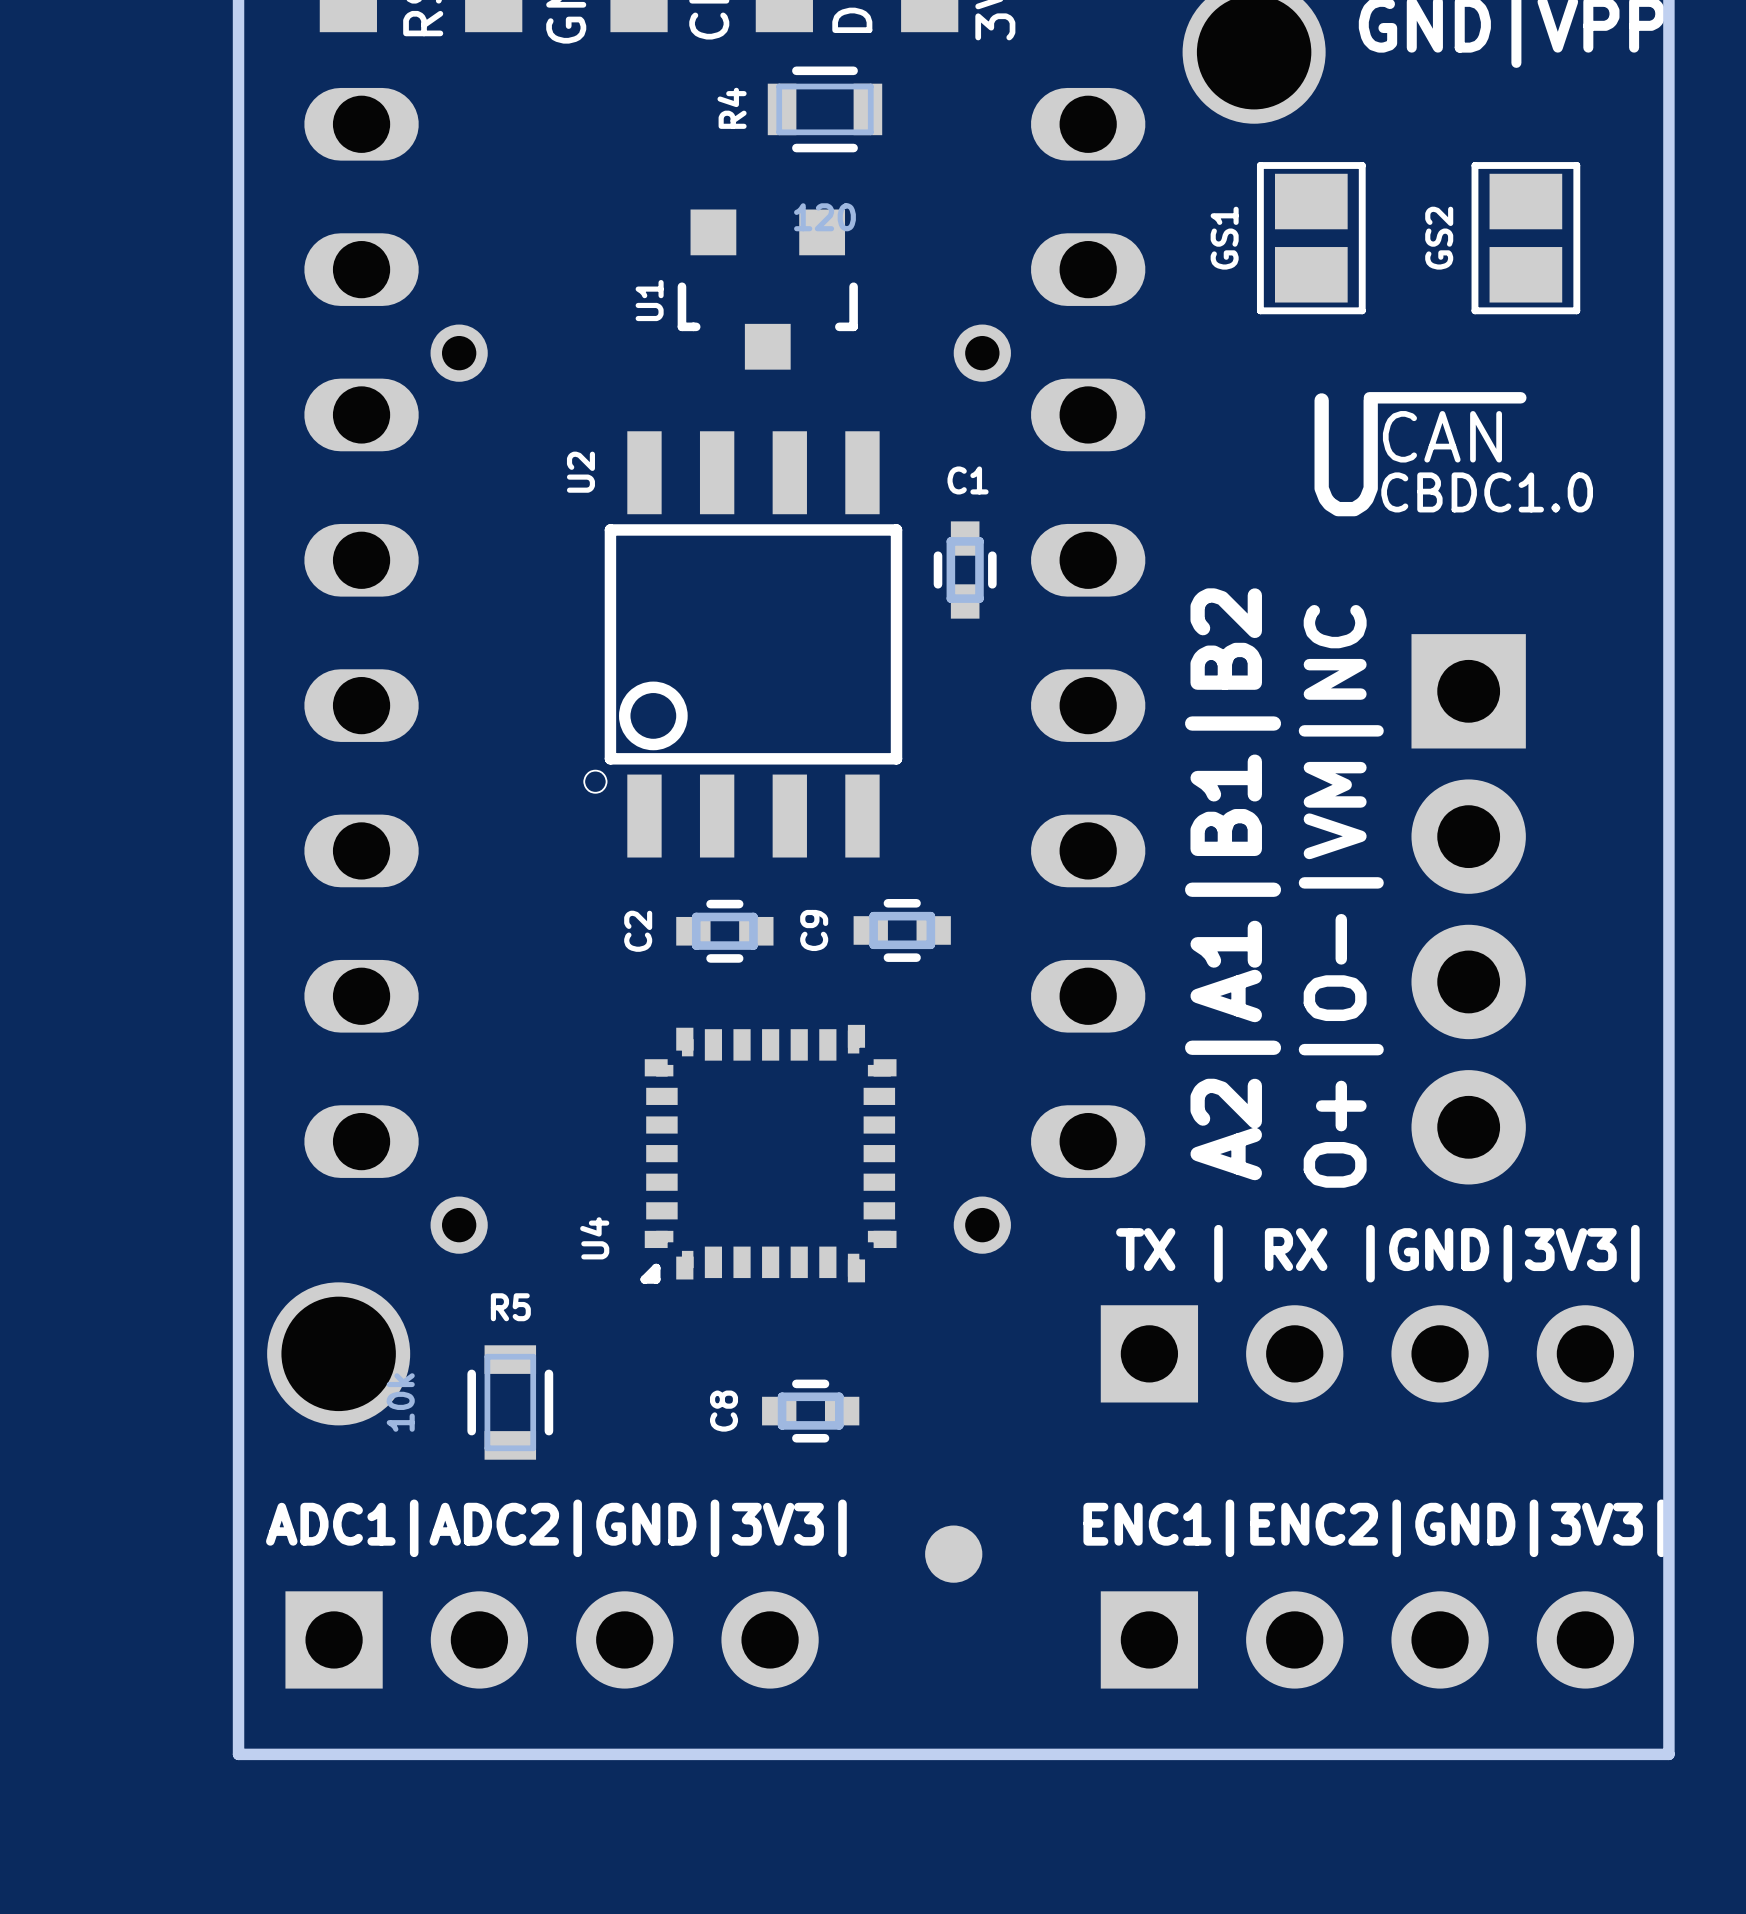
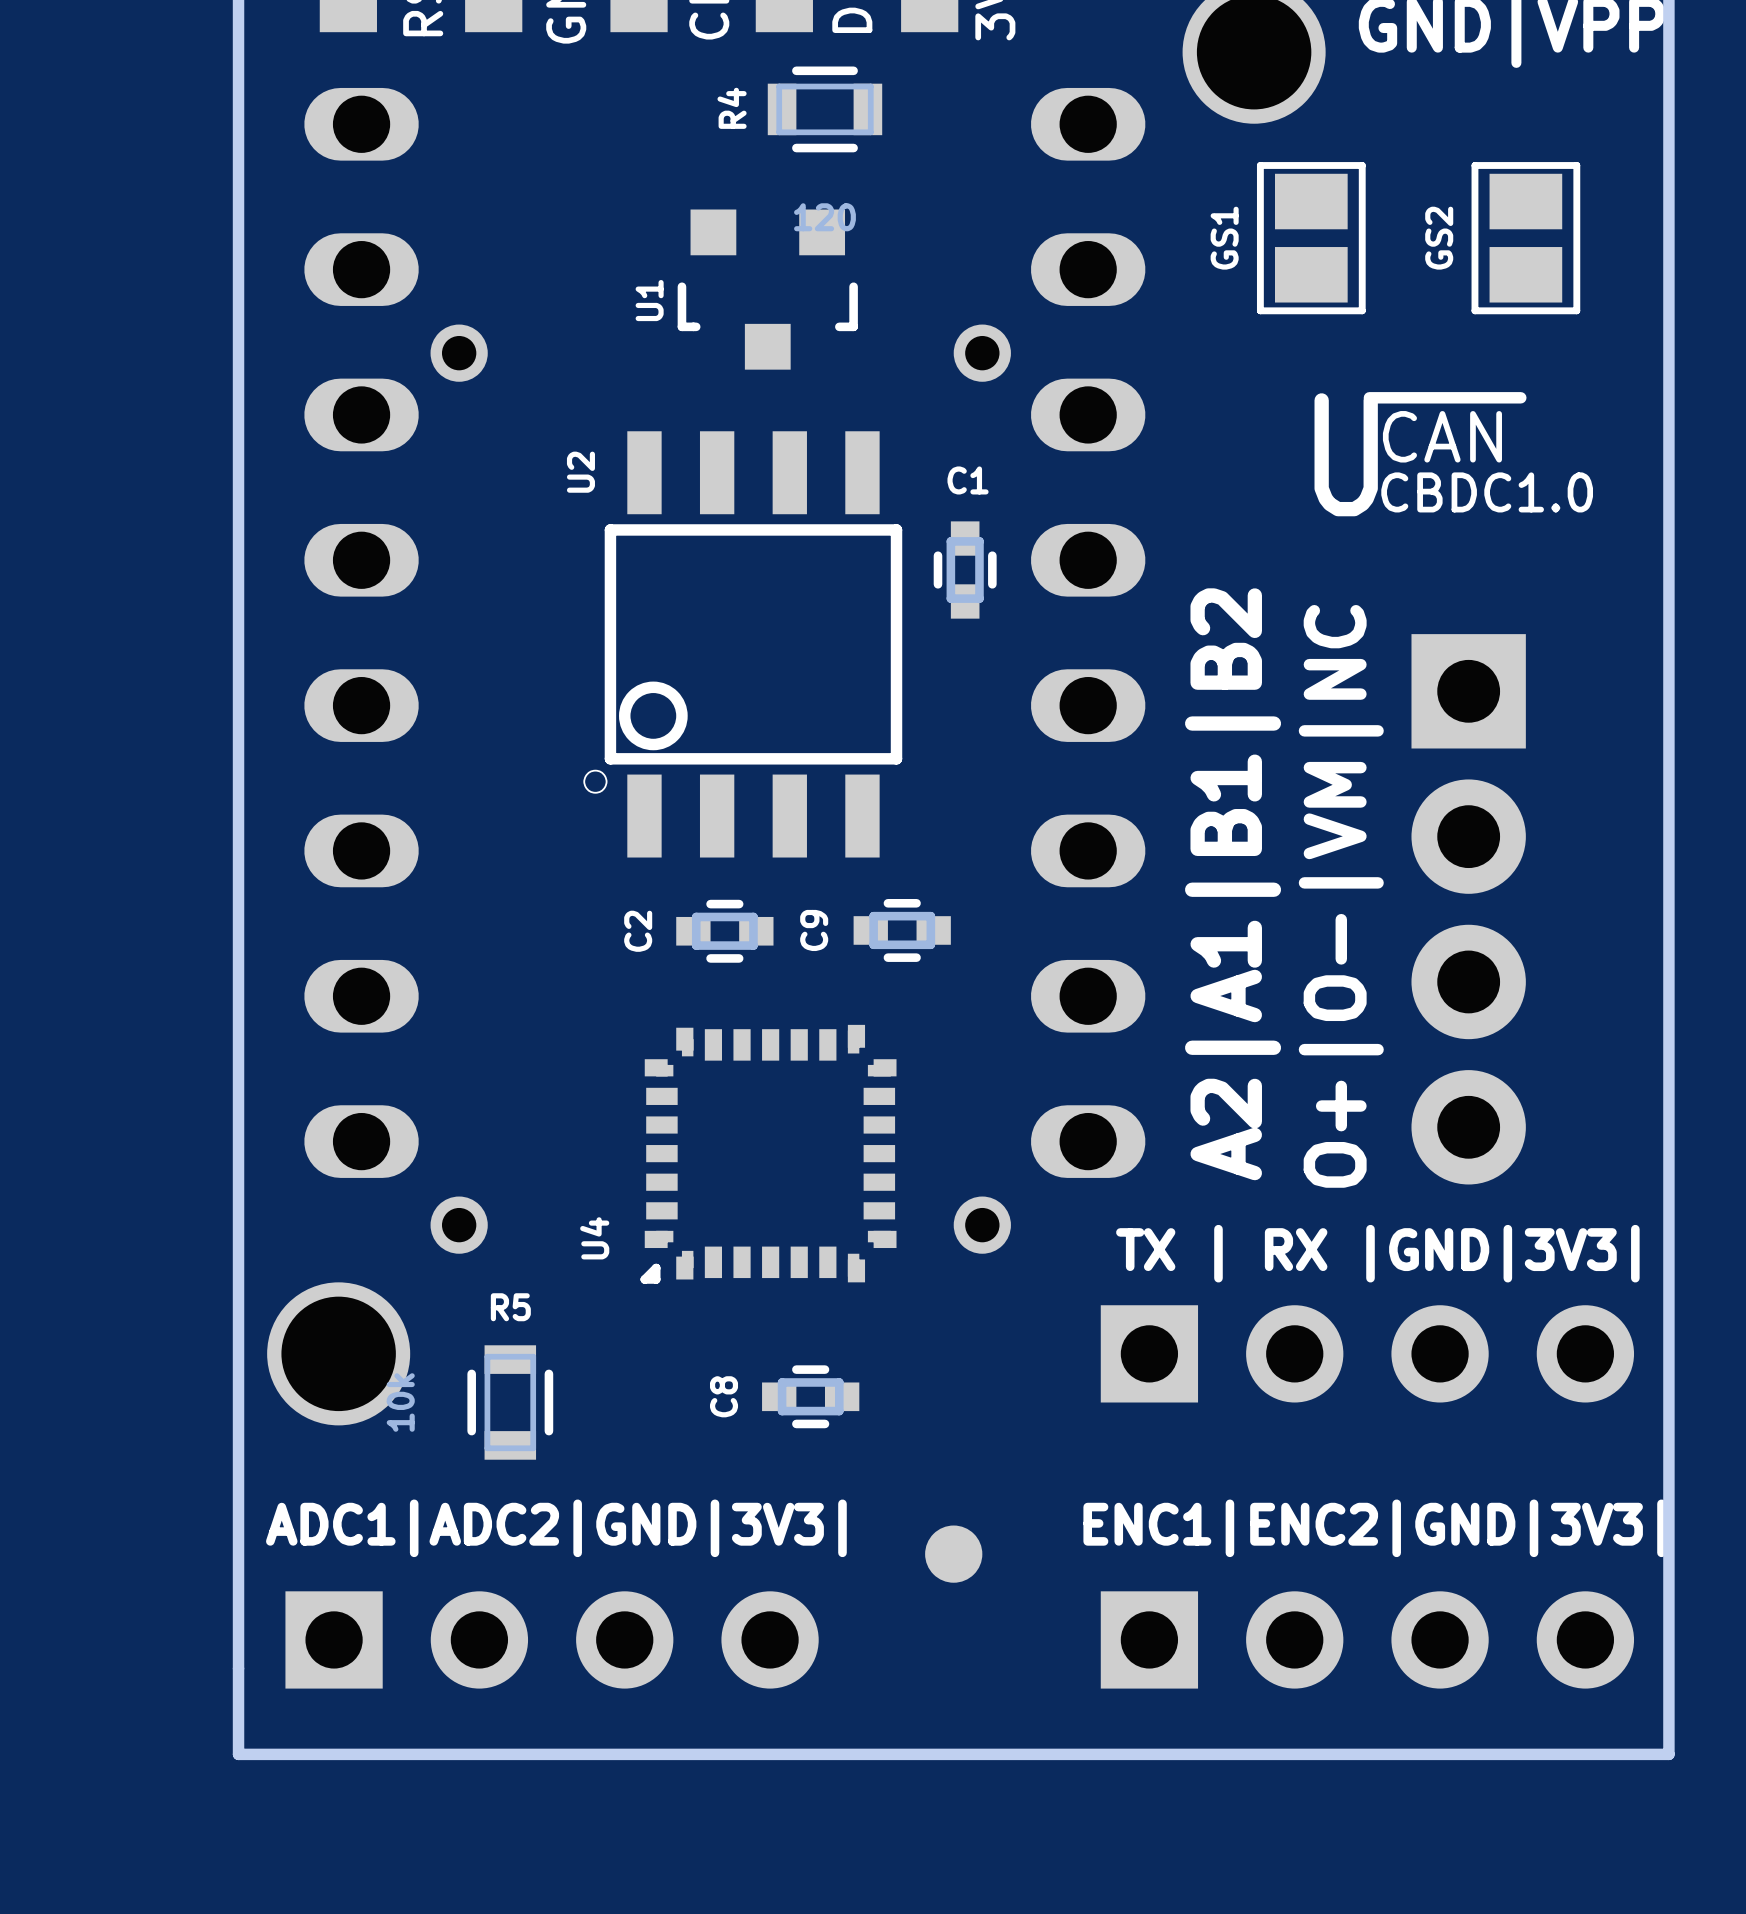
C8 position: (810, 1411) -> (810, 1396)

